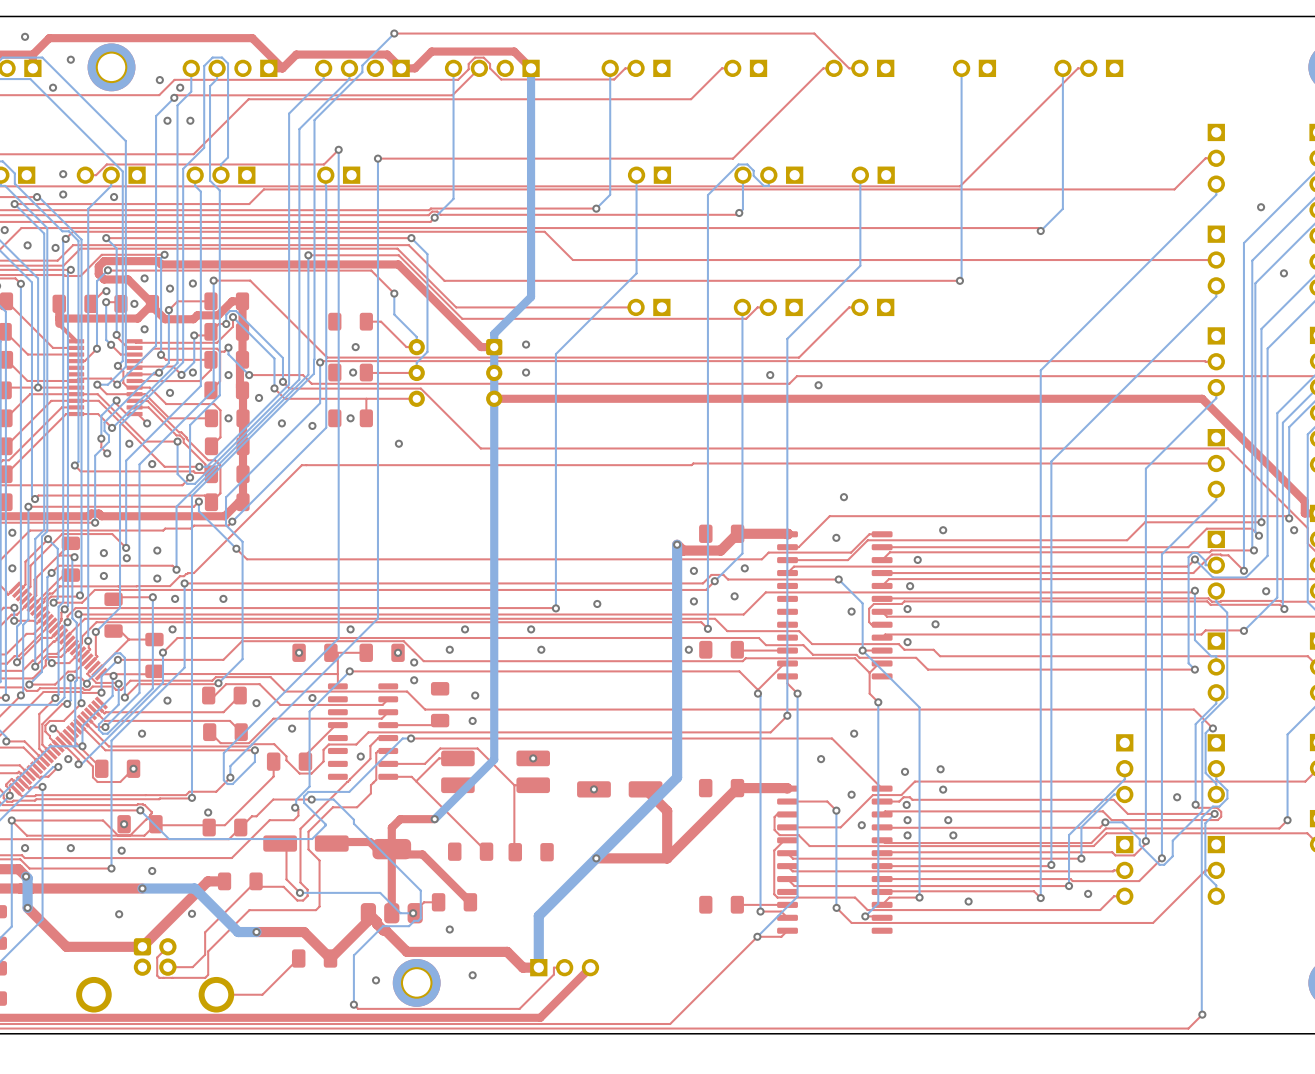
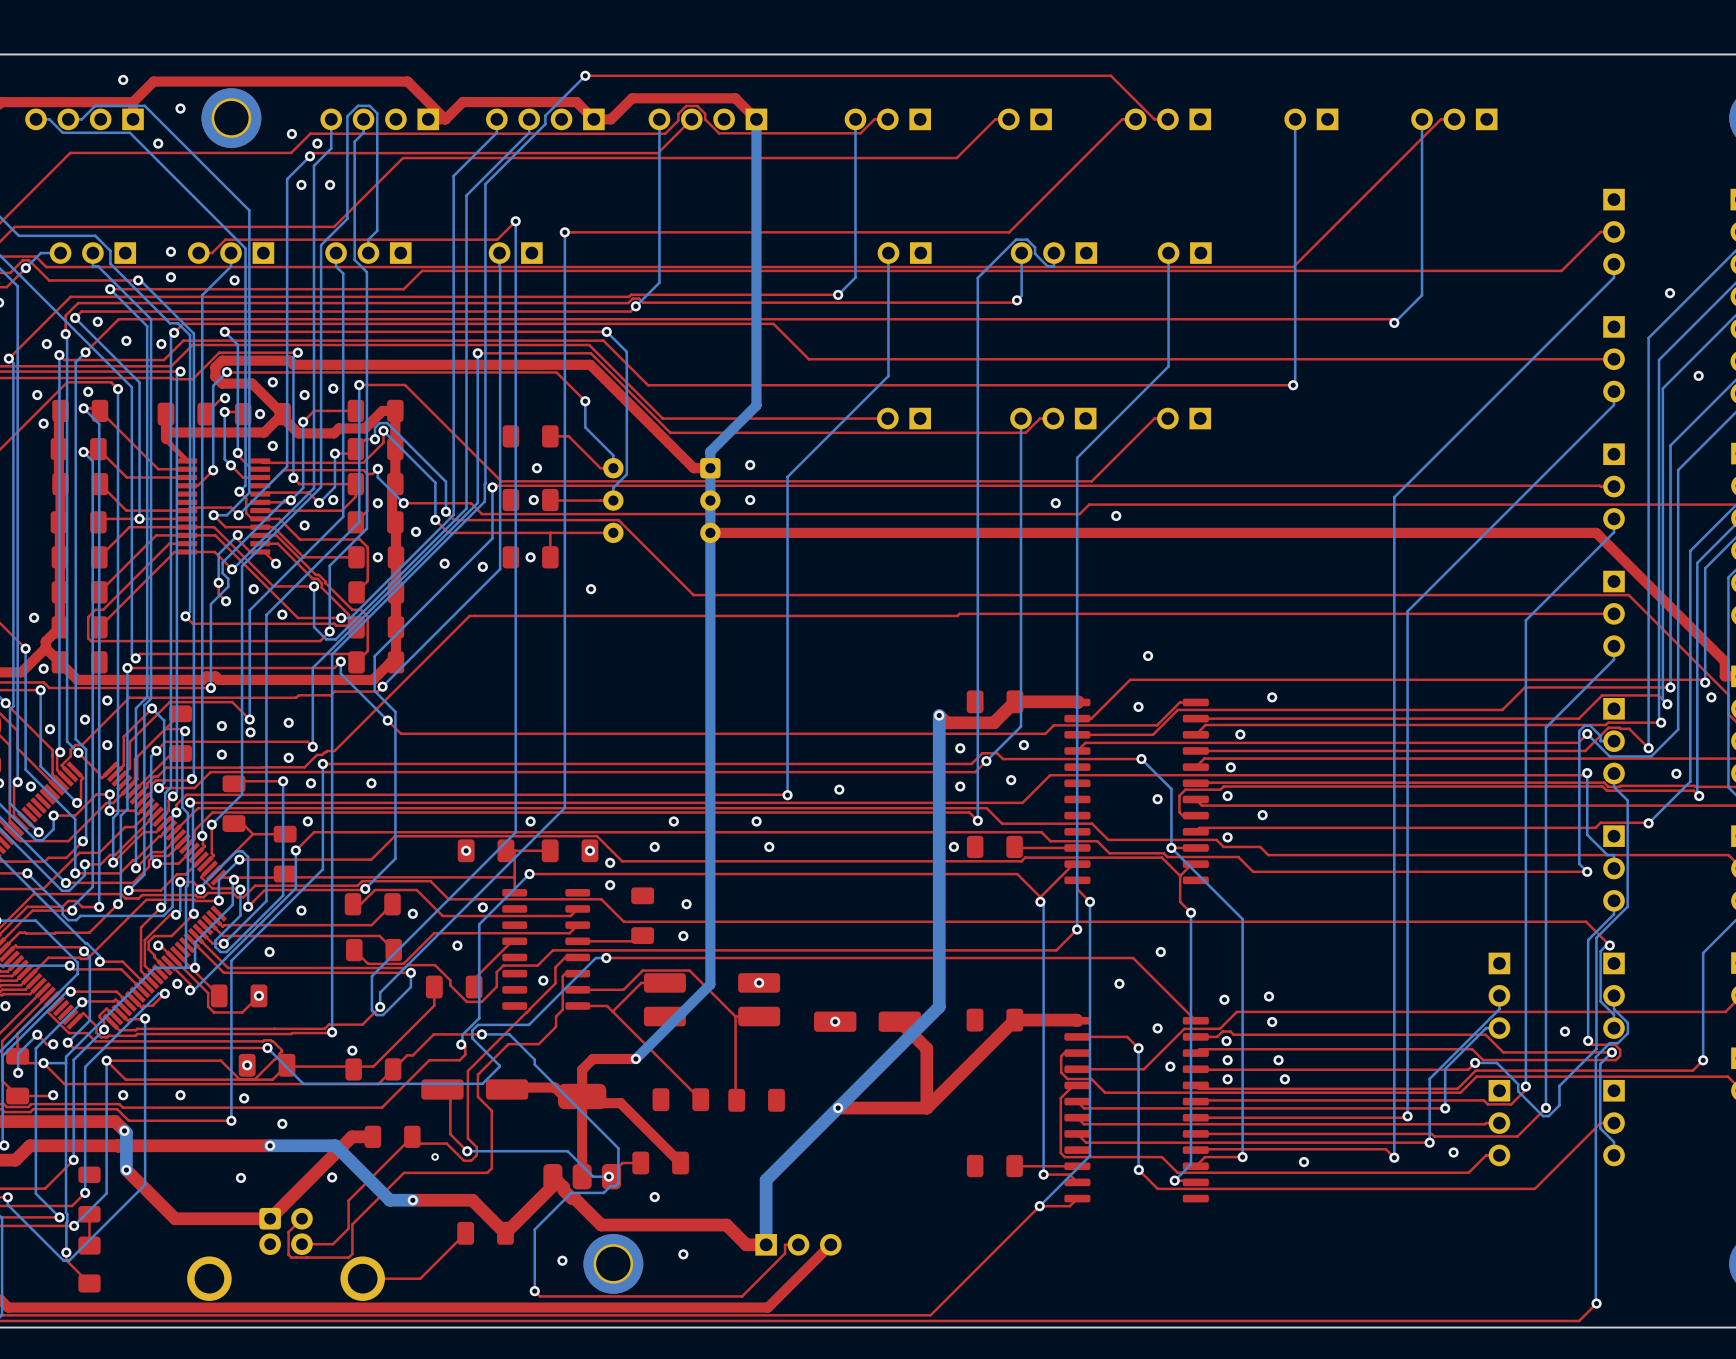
via: none -> (435, 1156)

